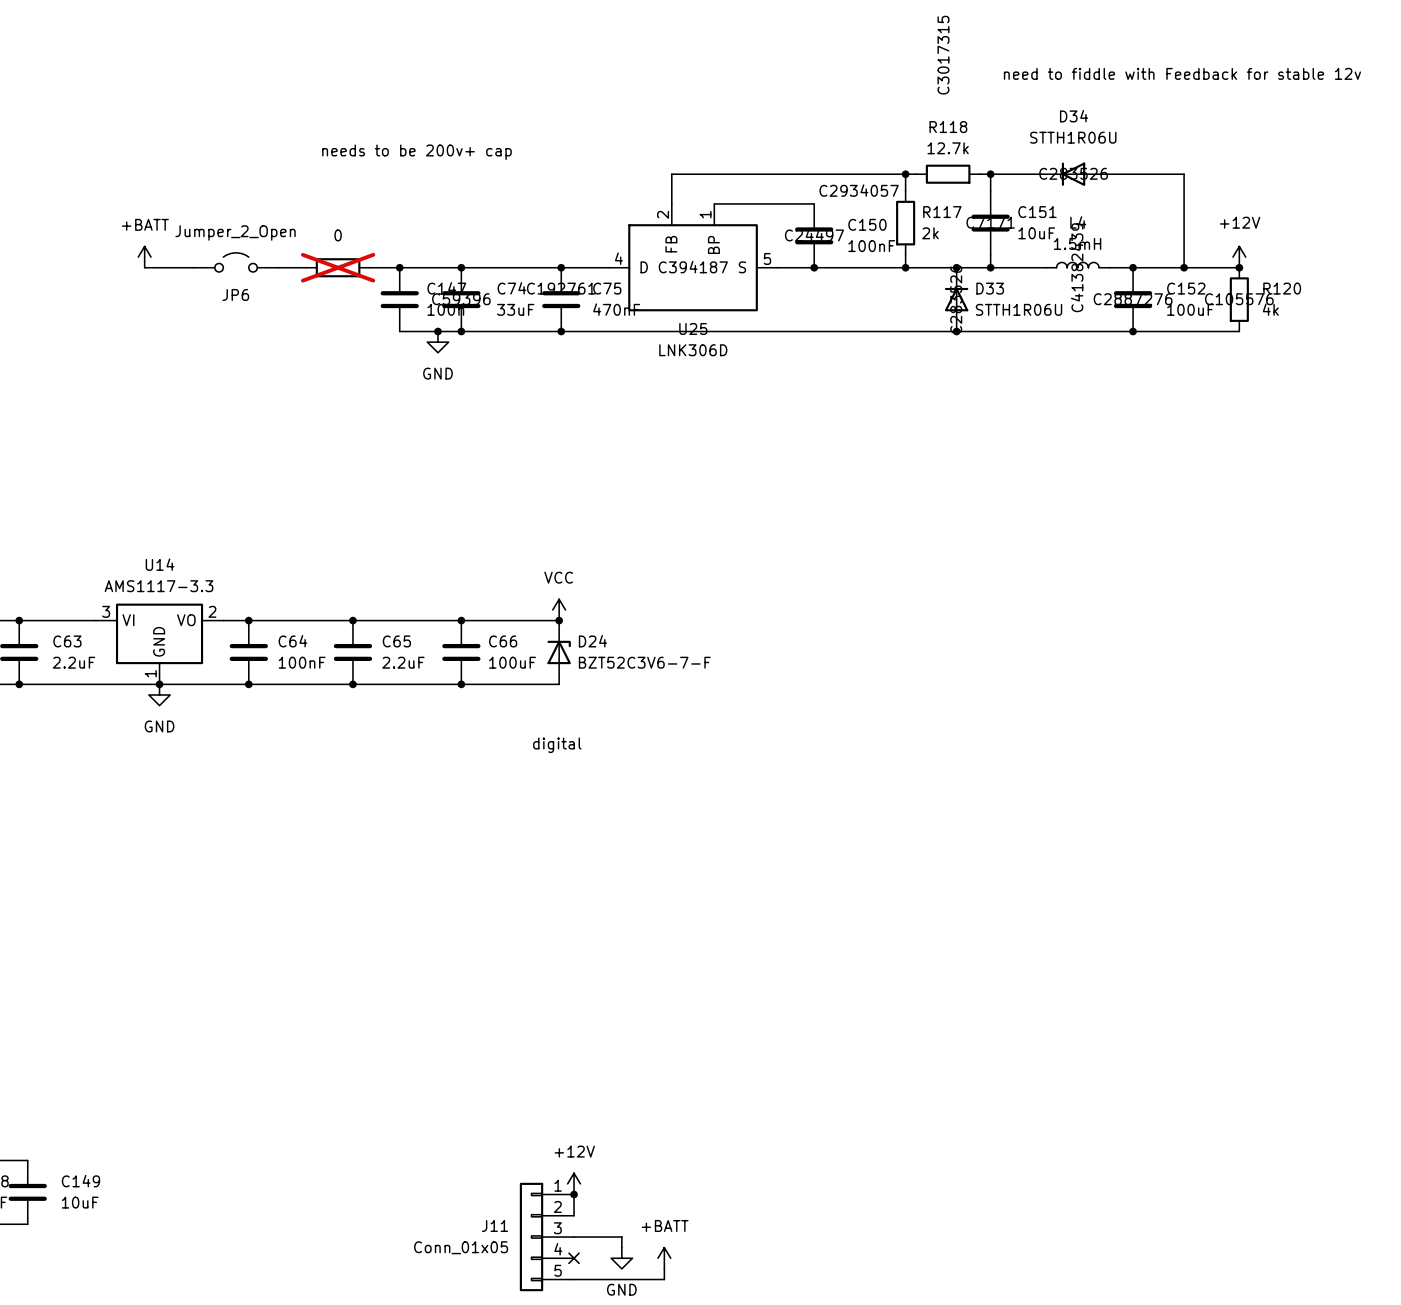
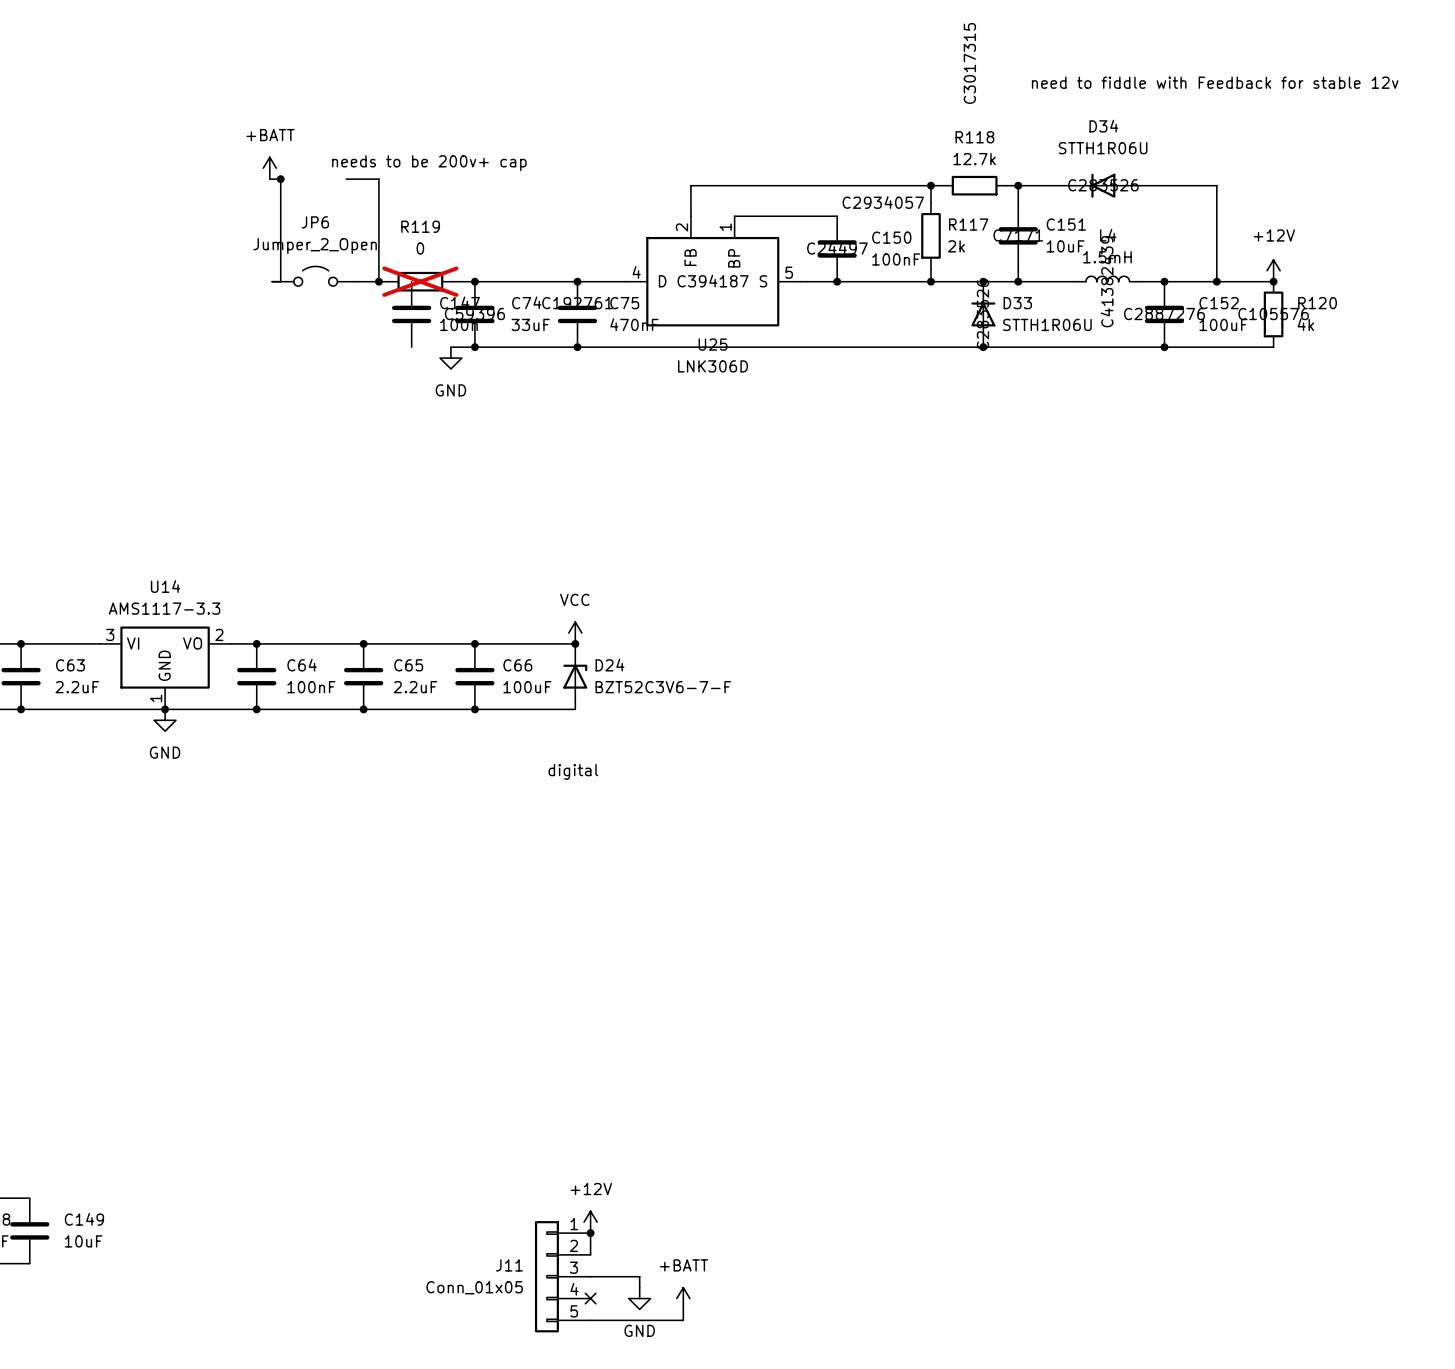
wire: none -> (269, 179) (280, 179) (280, 281) (272, 281)
junction: none -> (280, 179)
wire: none -> (346, 179) (378, 179) (378, 281)
power symbol position: +BATT (144, 257) -> +BATT (269, 168)
JP6 position: (236, 262) -> (315, 276)
wire: (144, 267) (193, 267) -> none
wire: (278, 267) (306, 267) -> none
part: 0 (338, 267) -> none
junction position: (399, 267) -> (378, 281)
R119: none -> 0 (420, 281)
JP6 name position: JP6 (235, 294) -> JP6 (315, 222)
wire: (399, 331) (437, 331) -> none
junction: (437, 331) -> none

